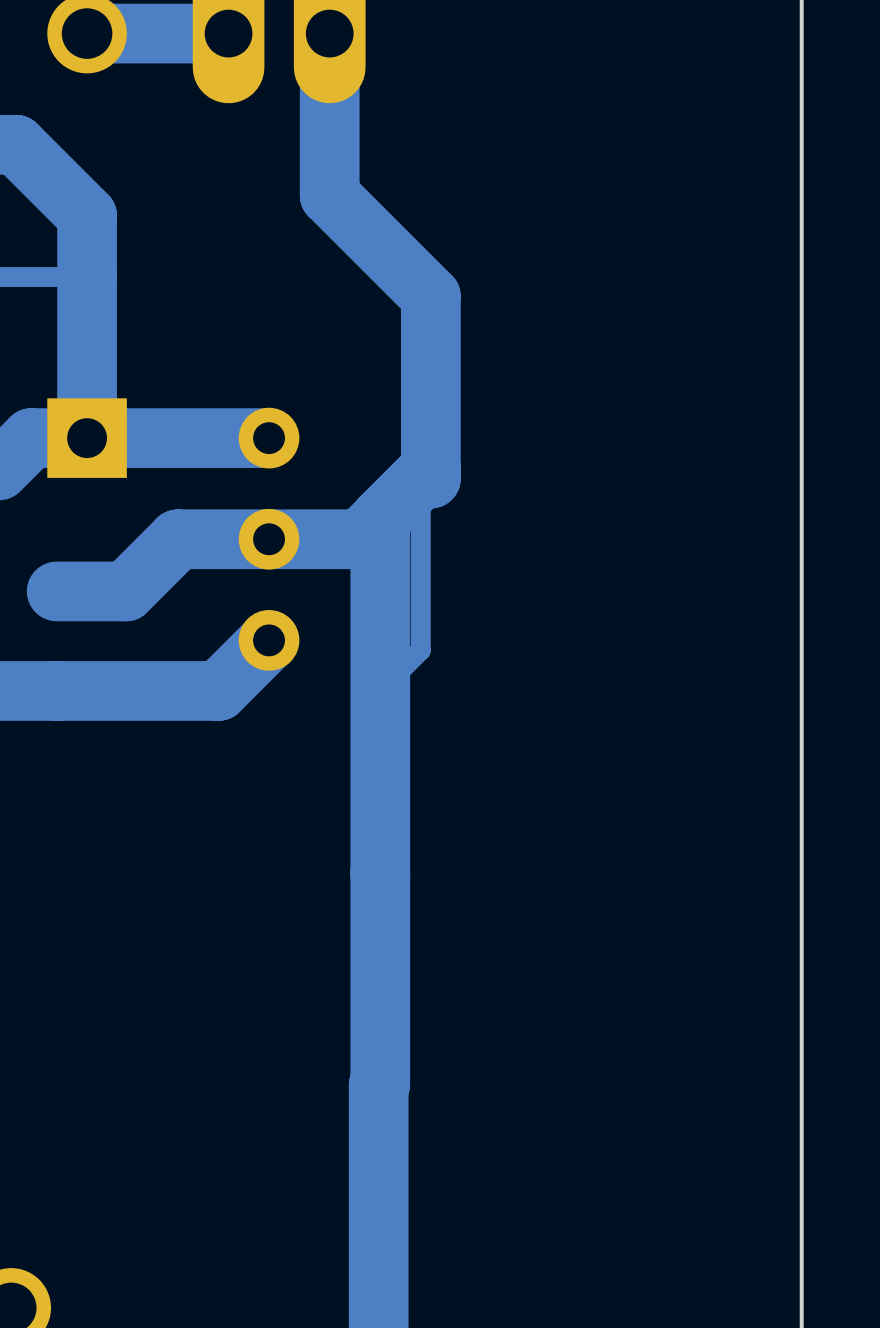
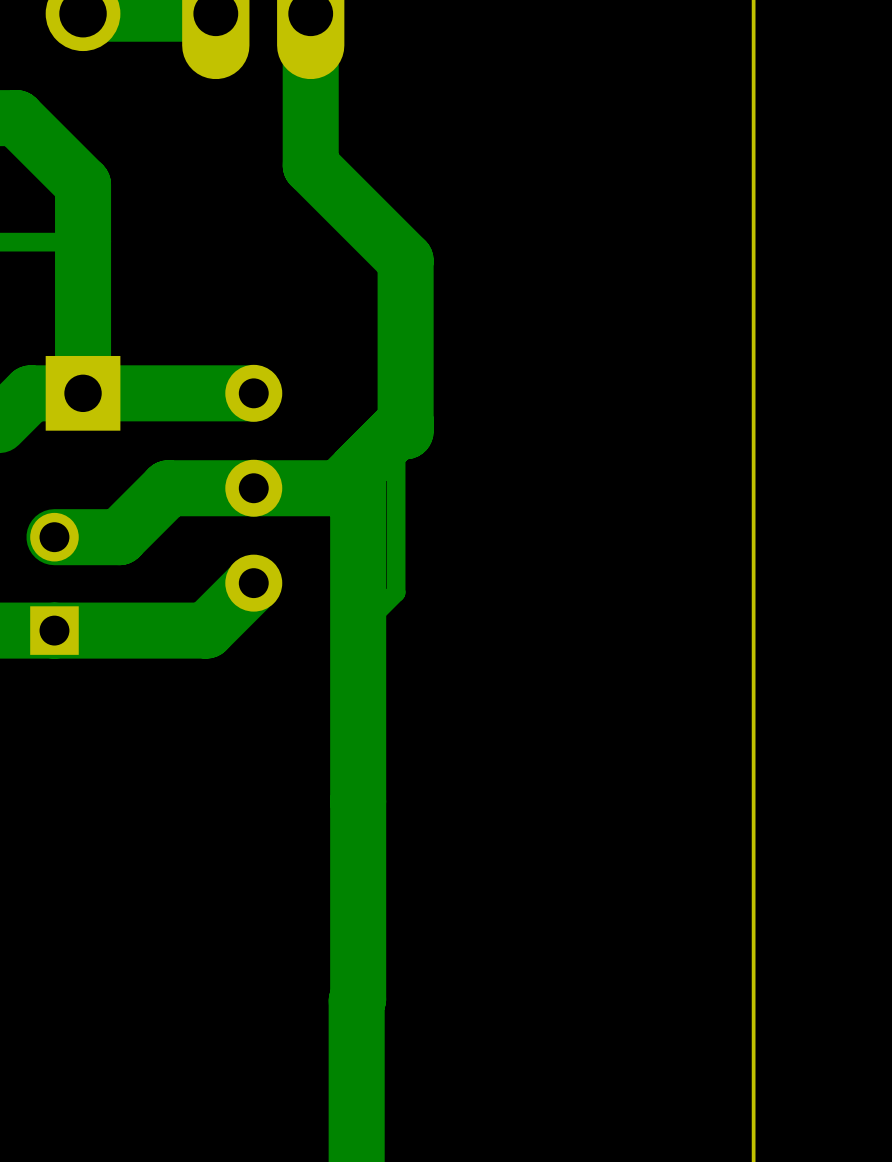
part: none -> (54, 583)

